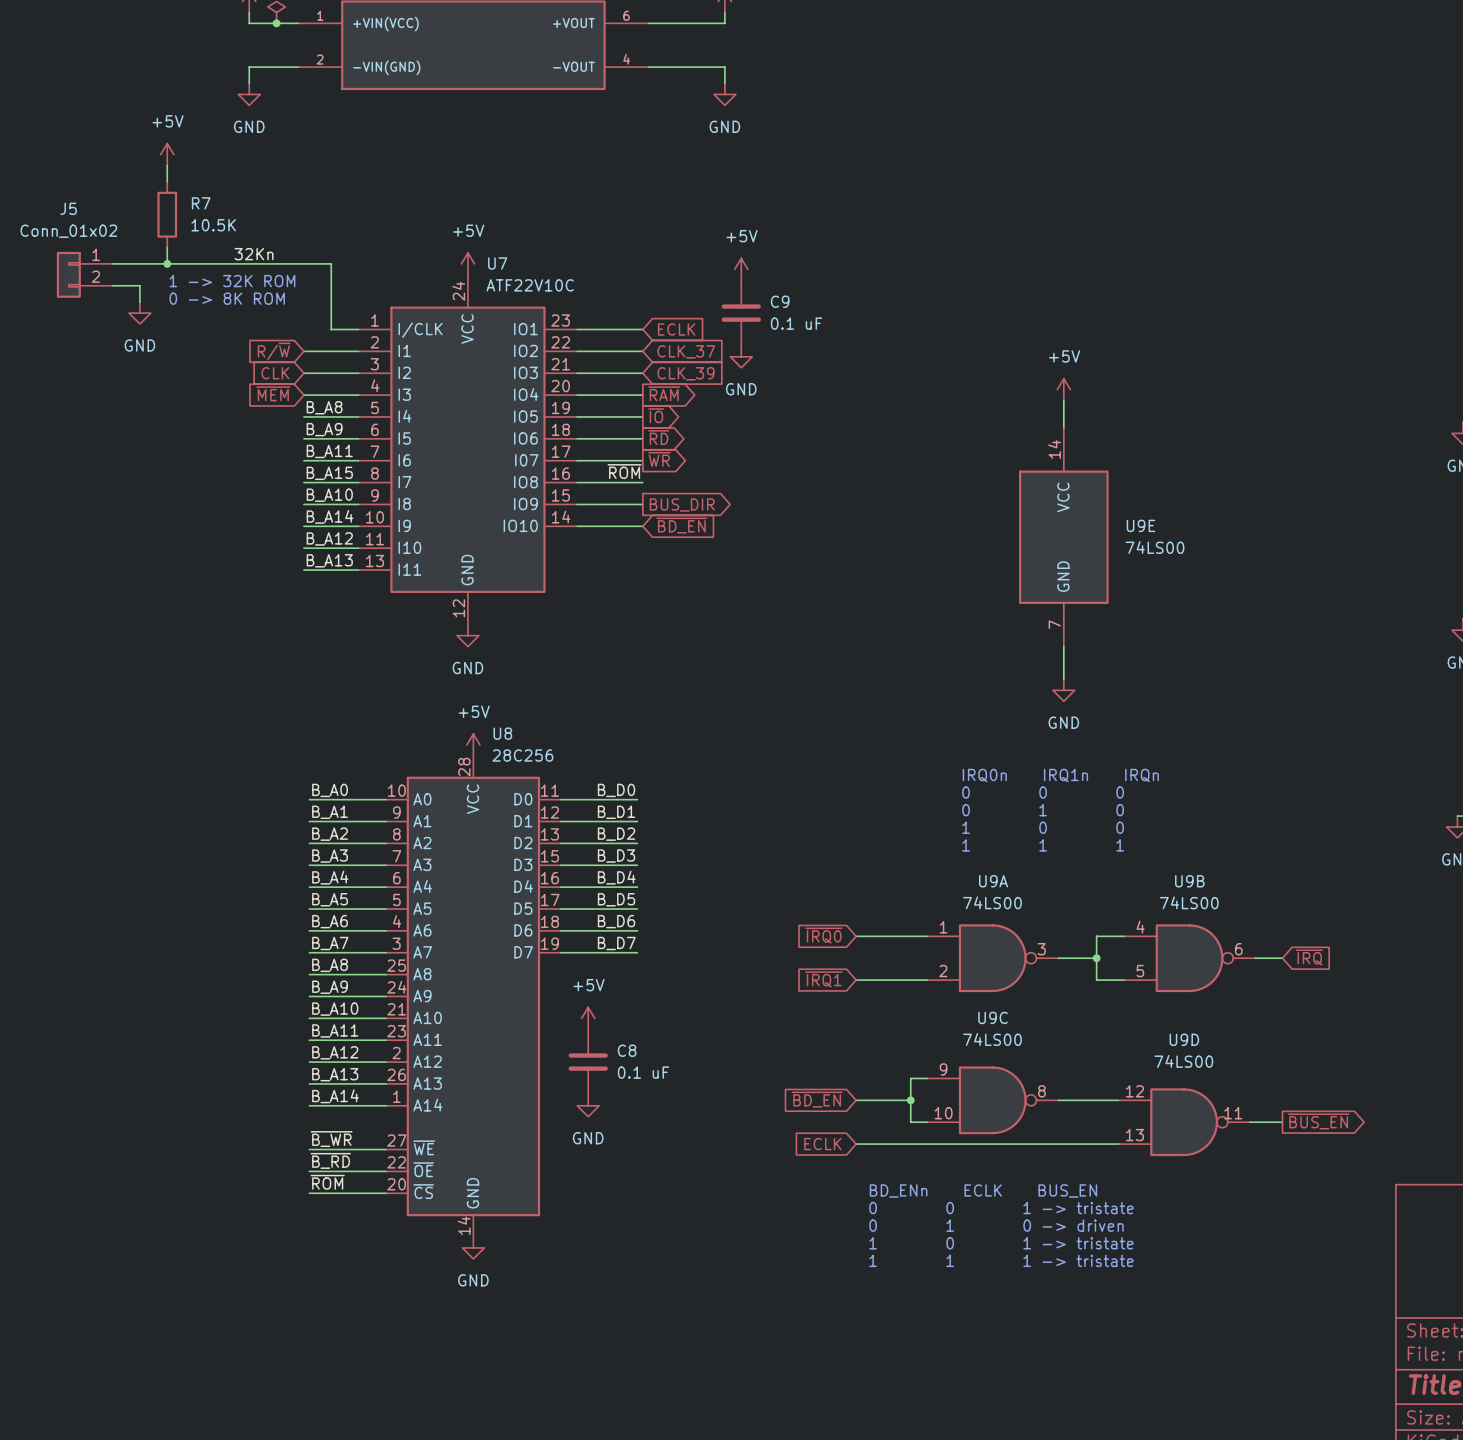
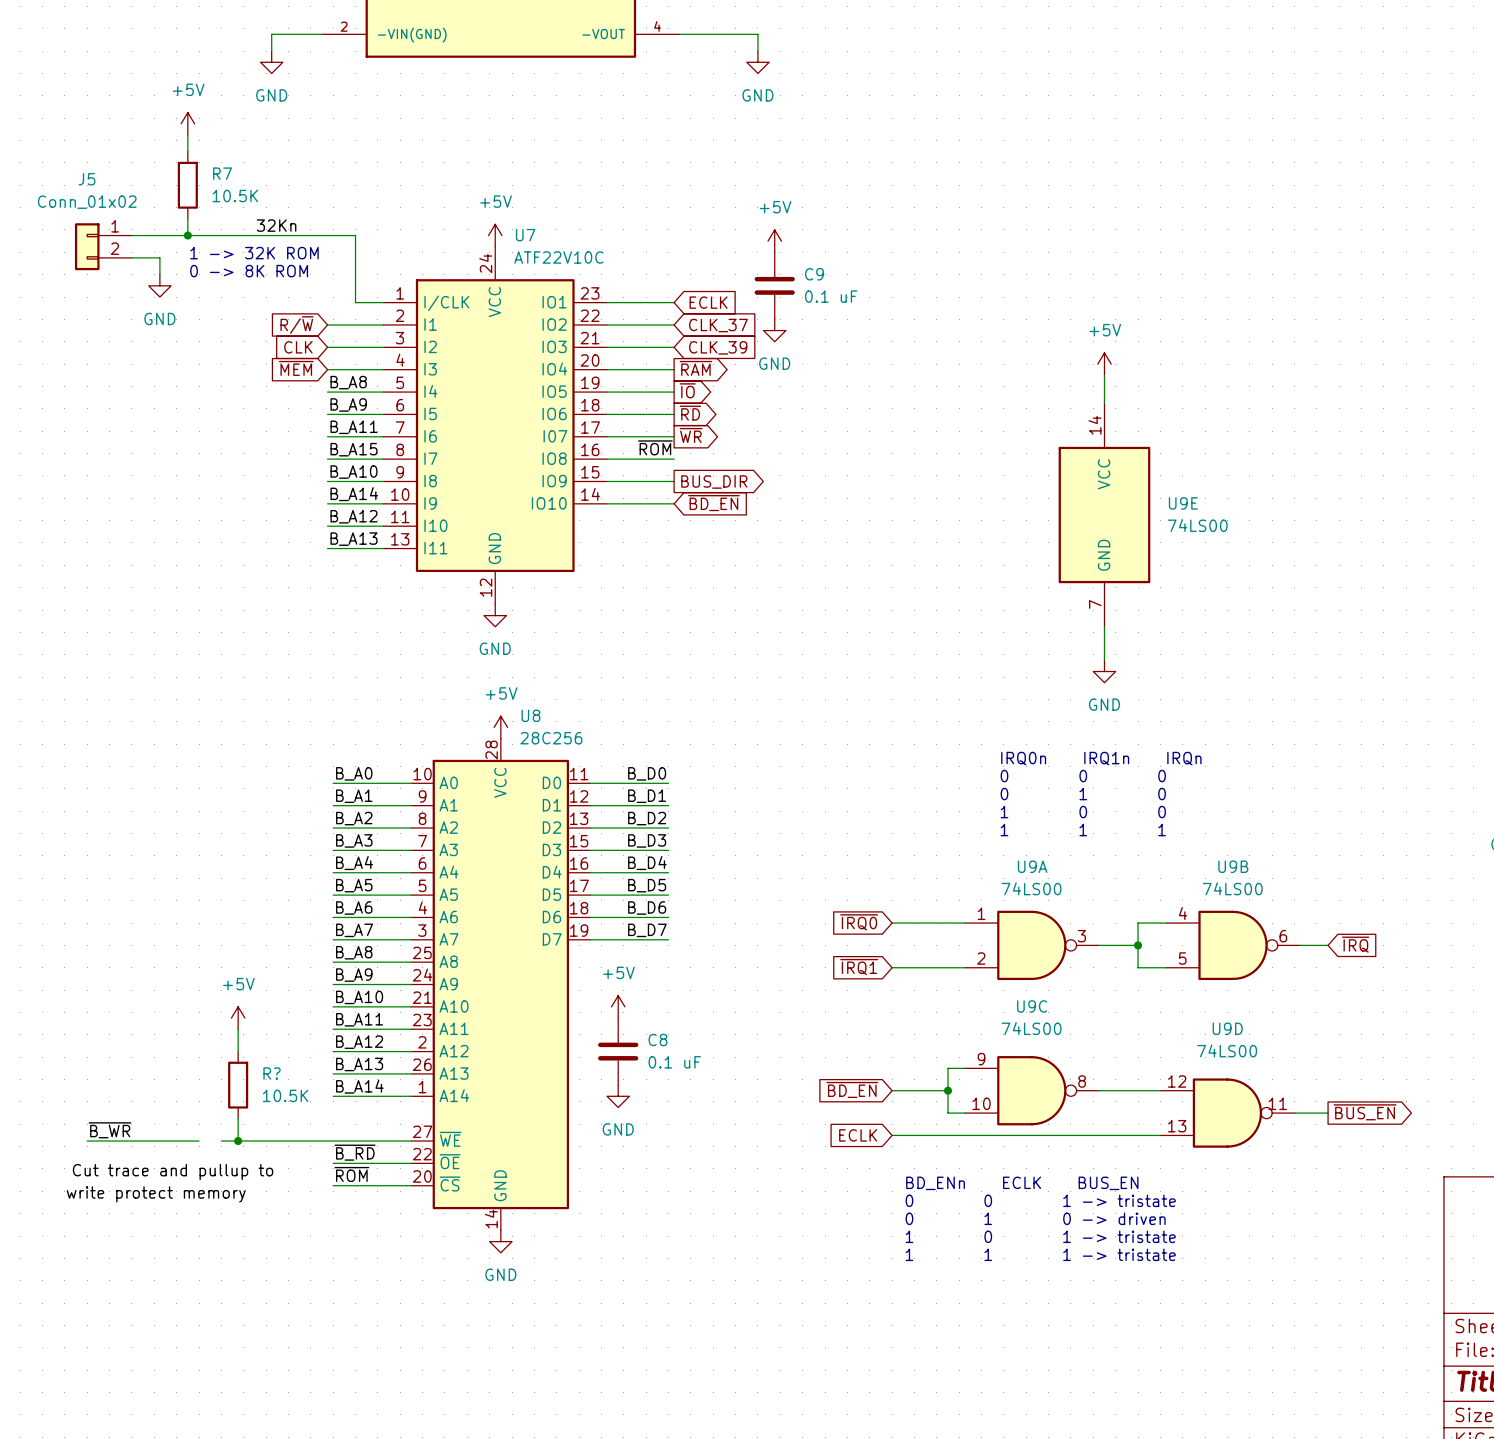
power symbol: none -> +5V (238, 1018)
wire: none -> (238, 1029) (238, 1051)
R?: none -> 10.5K (238, 1085)
wire: none -> (238, 1118) (238, 1141)
label: none -> ~{B_WR} (109, 1130)
label: ~{B_WR} (331, 1139) -> none
wire: none -> (87, 1141) (199, 1141)
wire: none -> (221, 1141) (333, 1141)
junction: none -> (238, 1141)
label: none -> Cut trace and pullup to (173, 1172)
label: none -> write protect memory (156, 1194)

